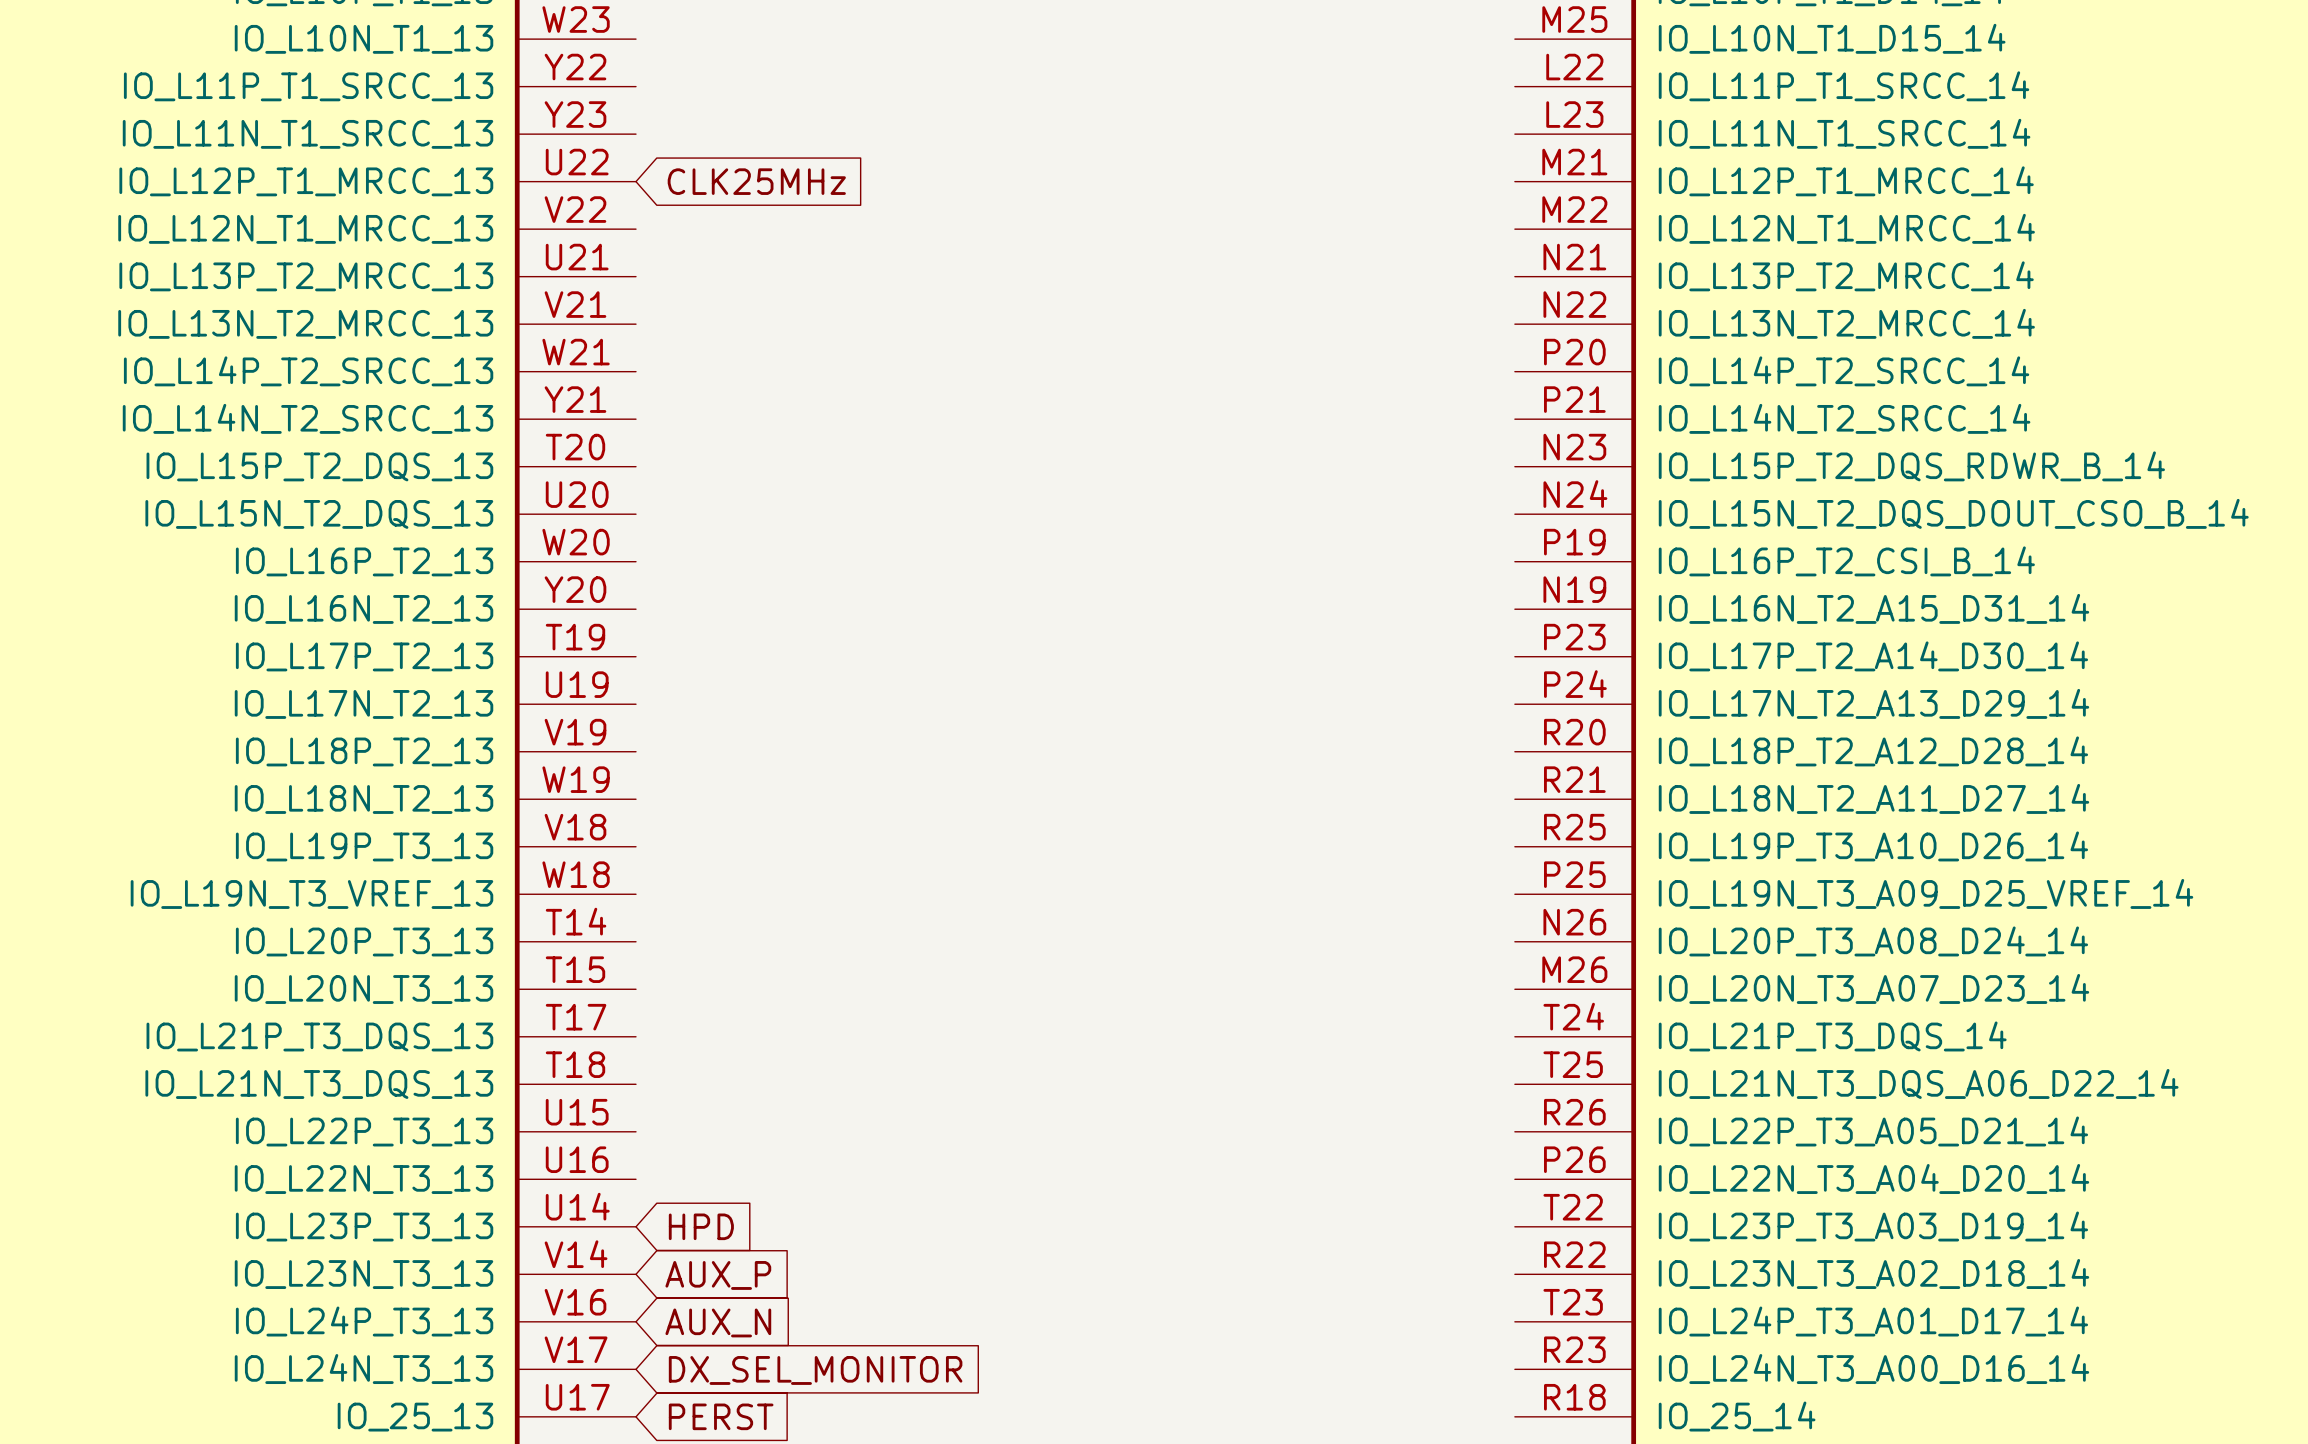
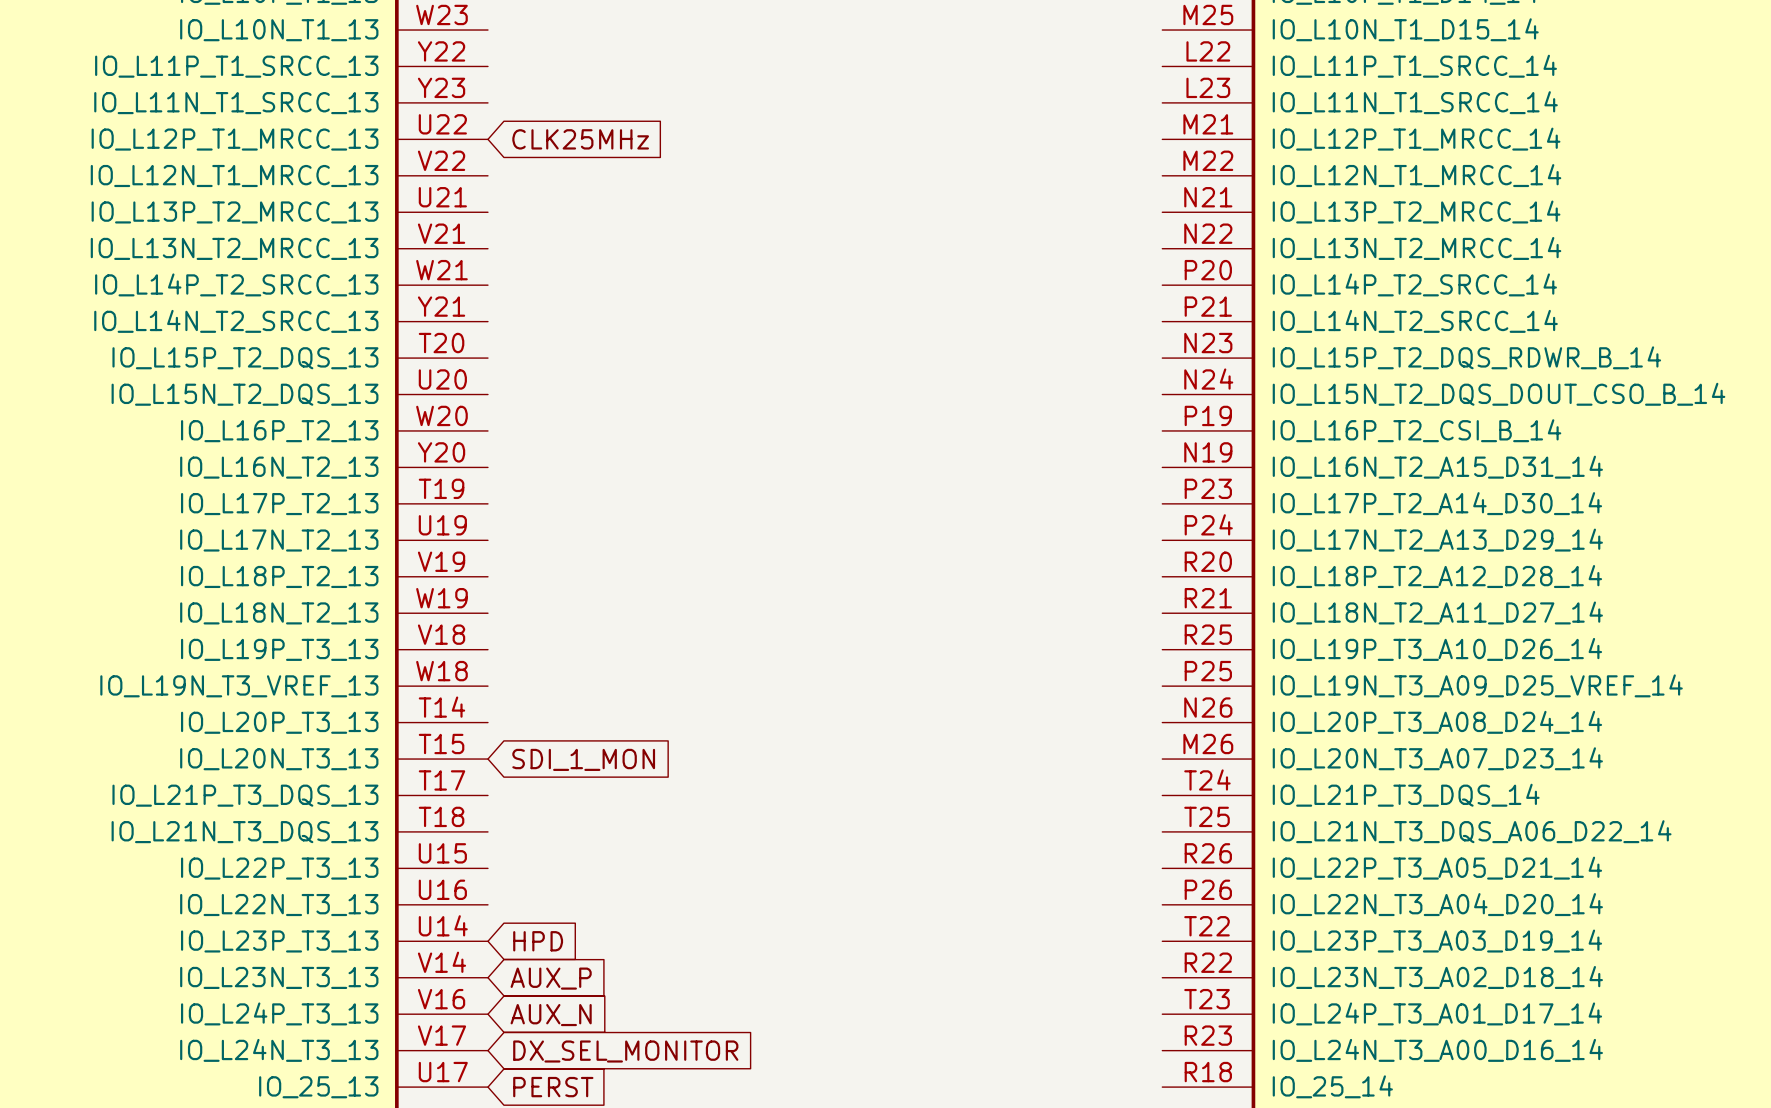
global label: none -> SDI_1_MON (583, 759)

